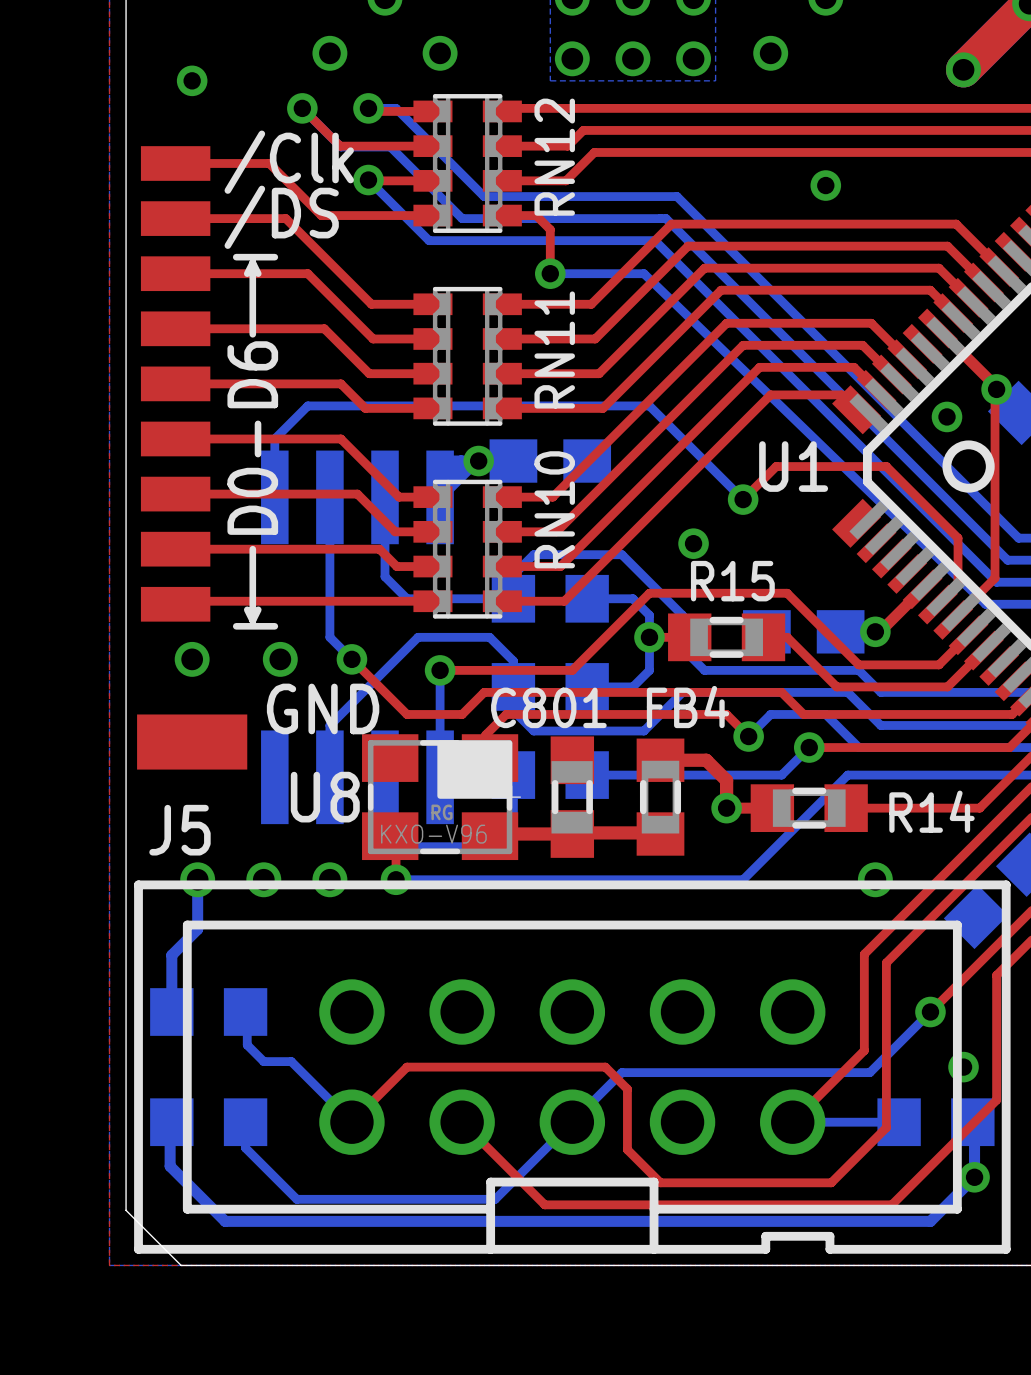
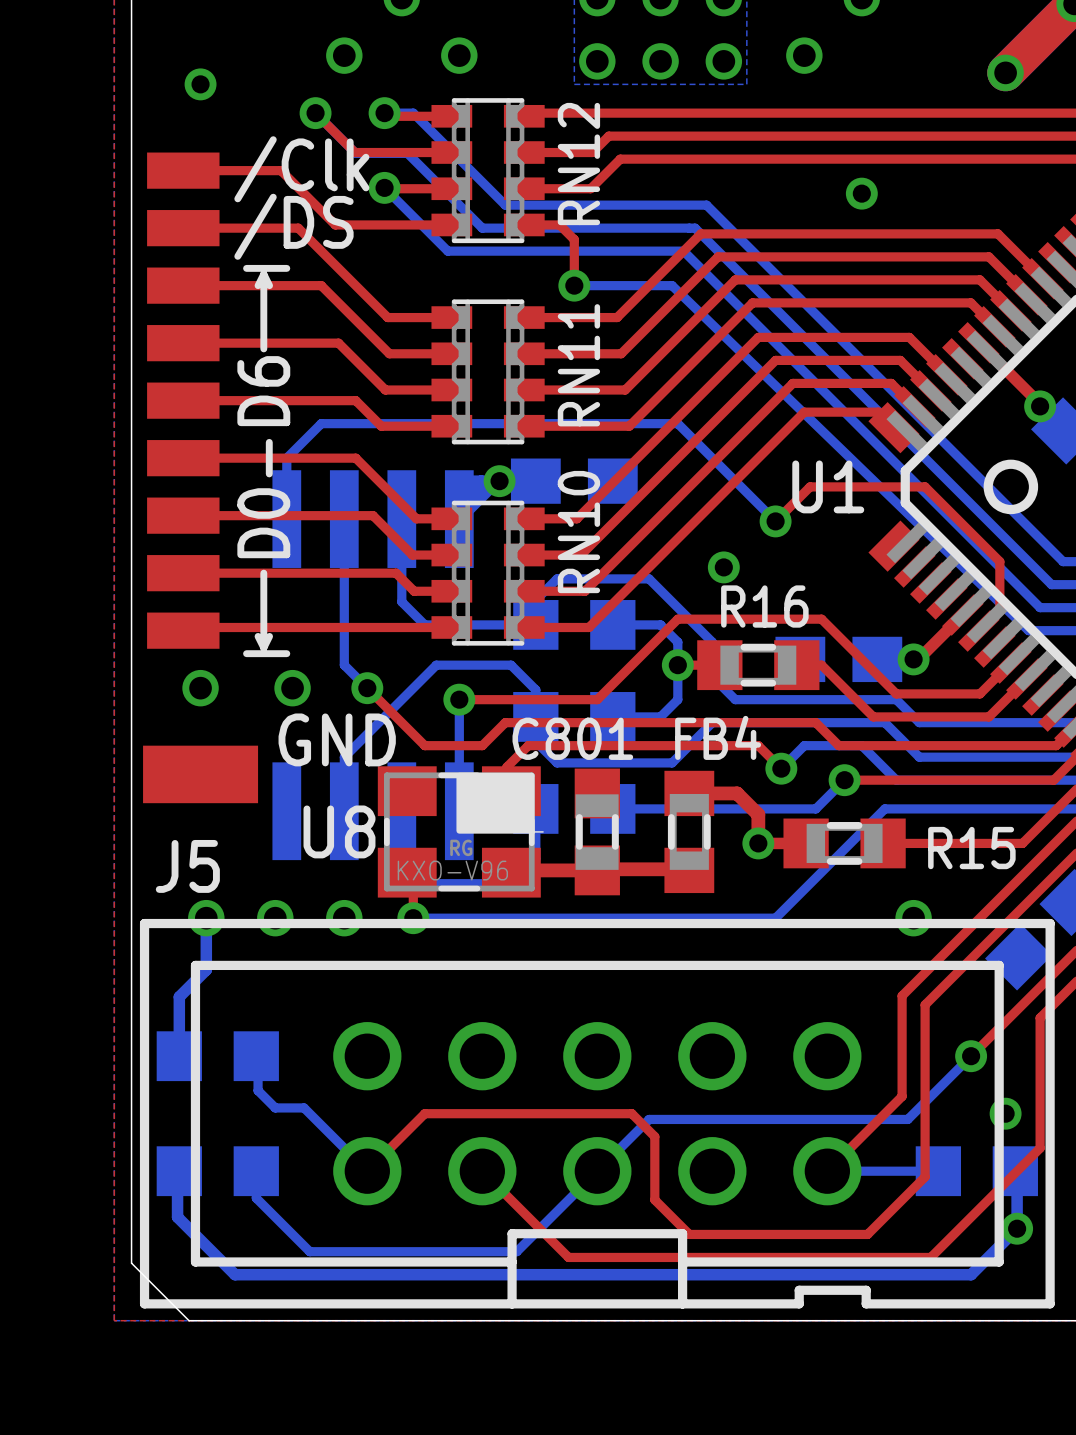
top track: (995, 385) (995, 578) (953, 619) -> none
via: (947, 416) -> none
text: R15 (732, 581) -> R16 (764, 606)
text: R14 (931, 811) -> R15 (971, 848)

